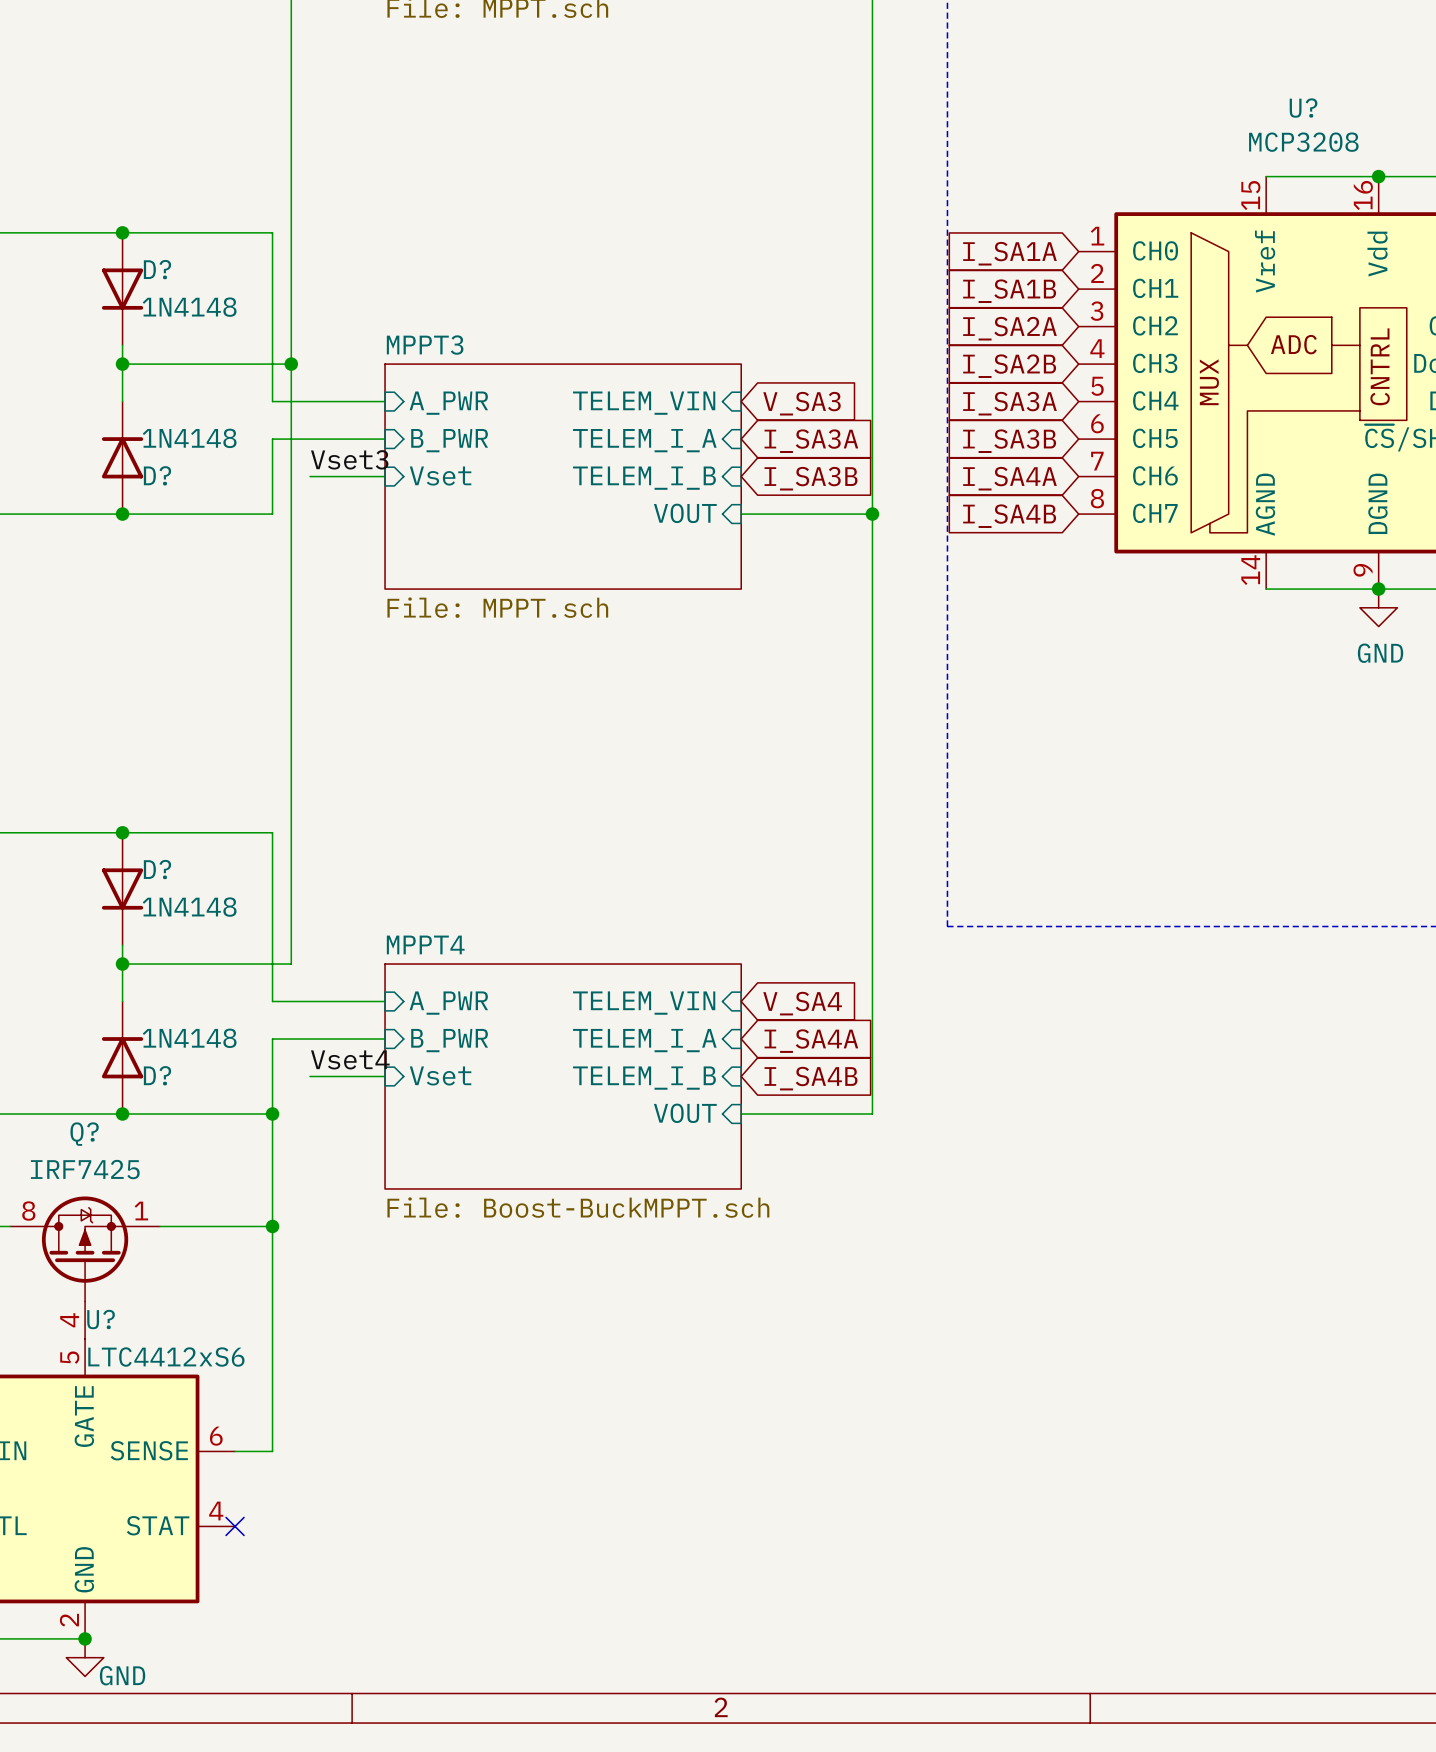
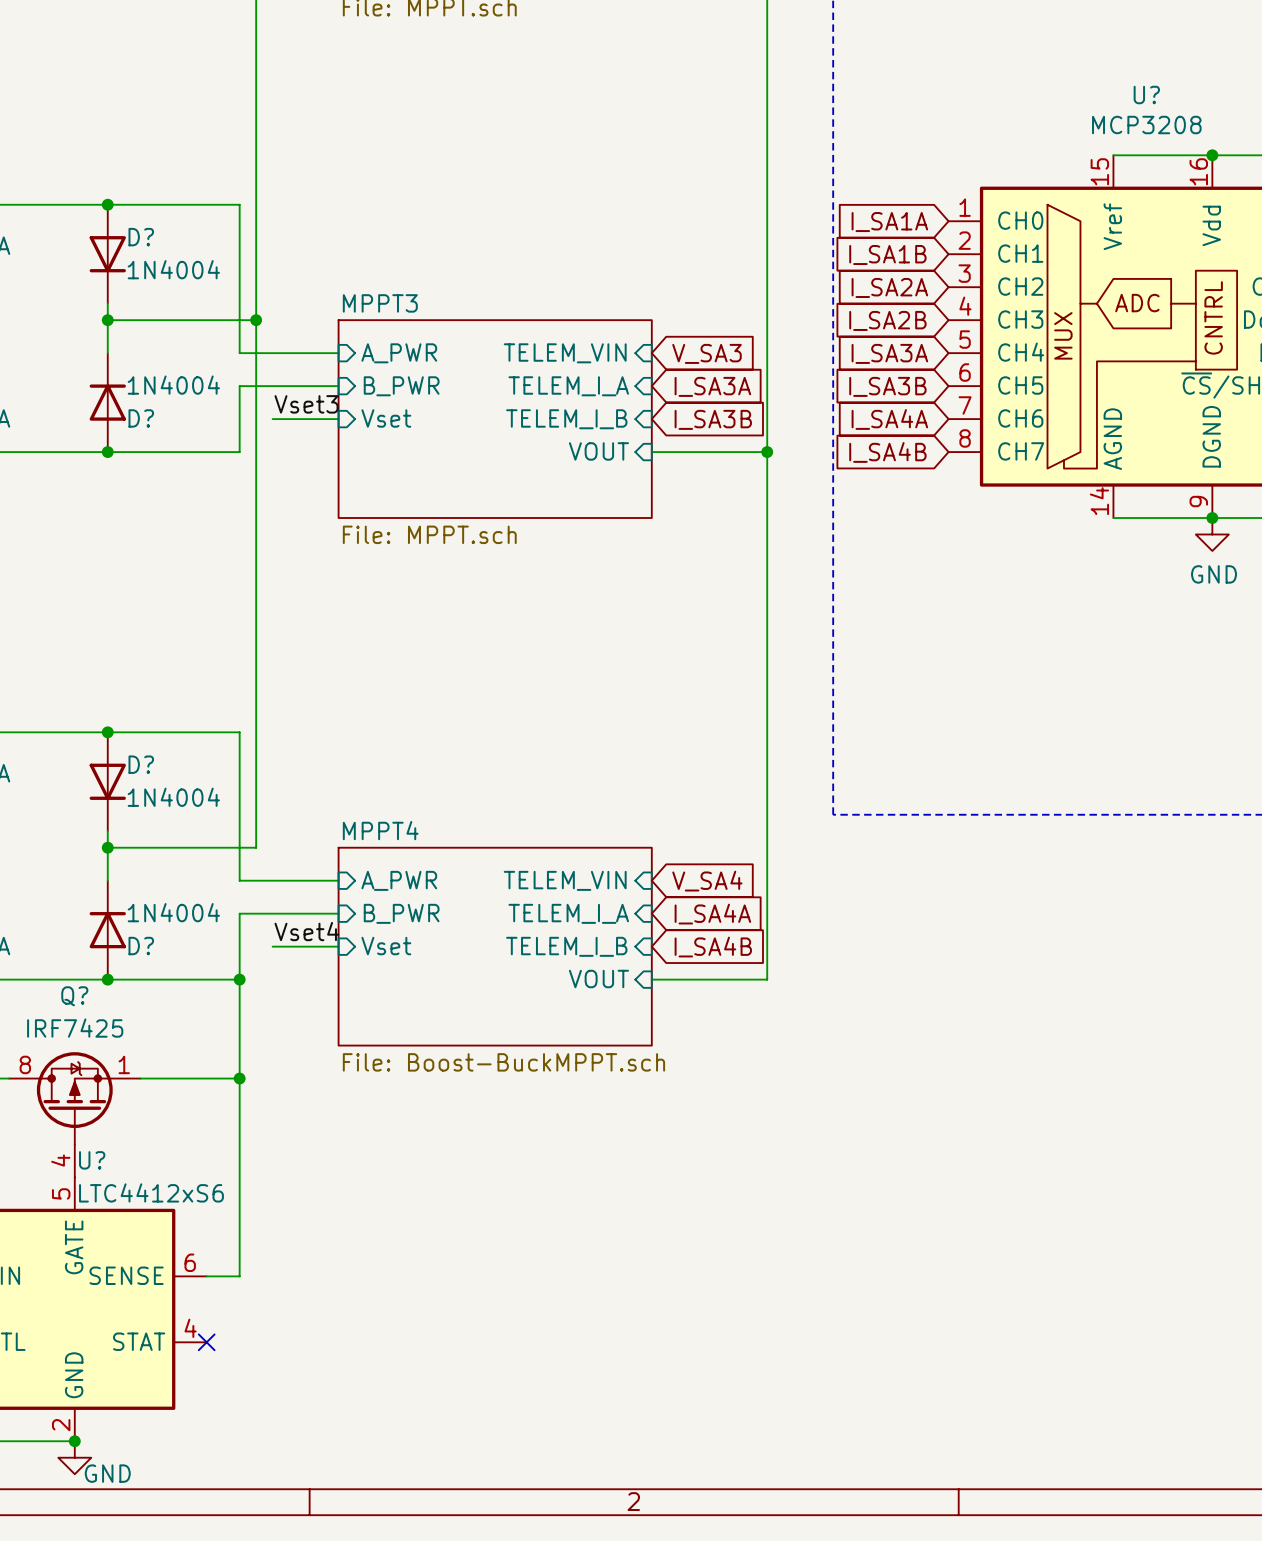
D? value: 1N4148 (189, 307) -> 1N4004 (173, 269)
D? value: 1N4148 (189, 438) -> 1N4004 (173, 385)
D? value: 1N4148 (189, 907) -> 1N4004 (173, 797)
D? value: 1N4148 (189, 1038) -> 1N4004 (173, 912)

